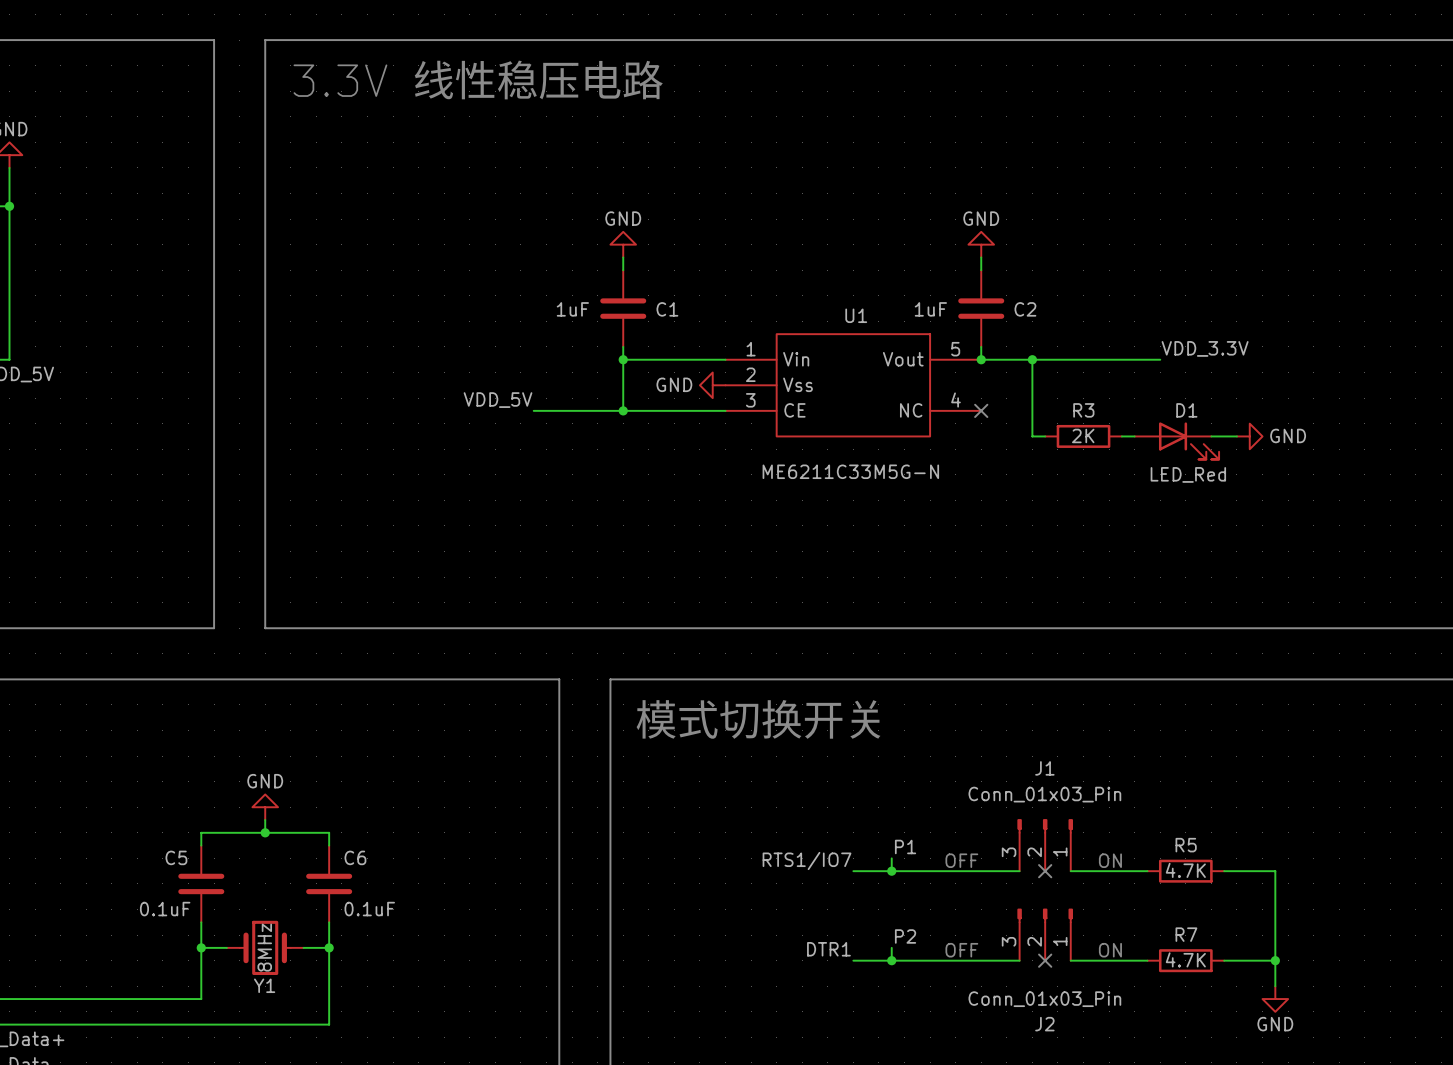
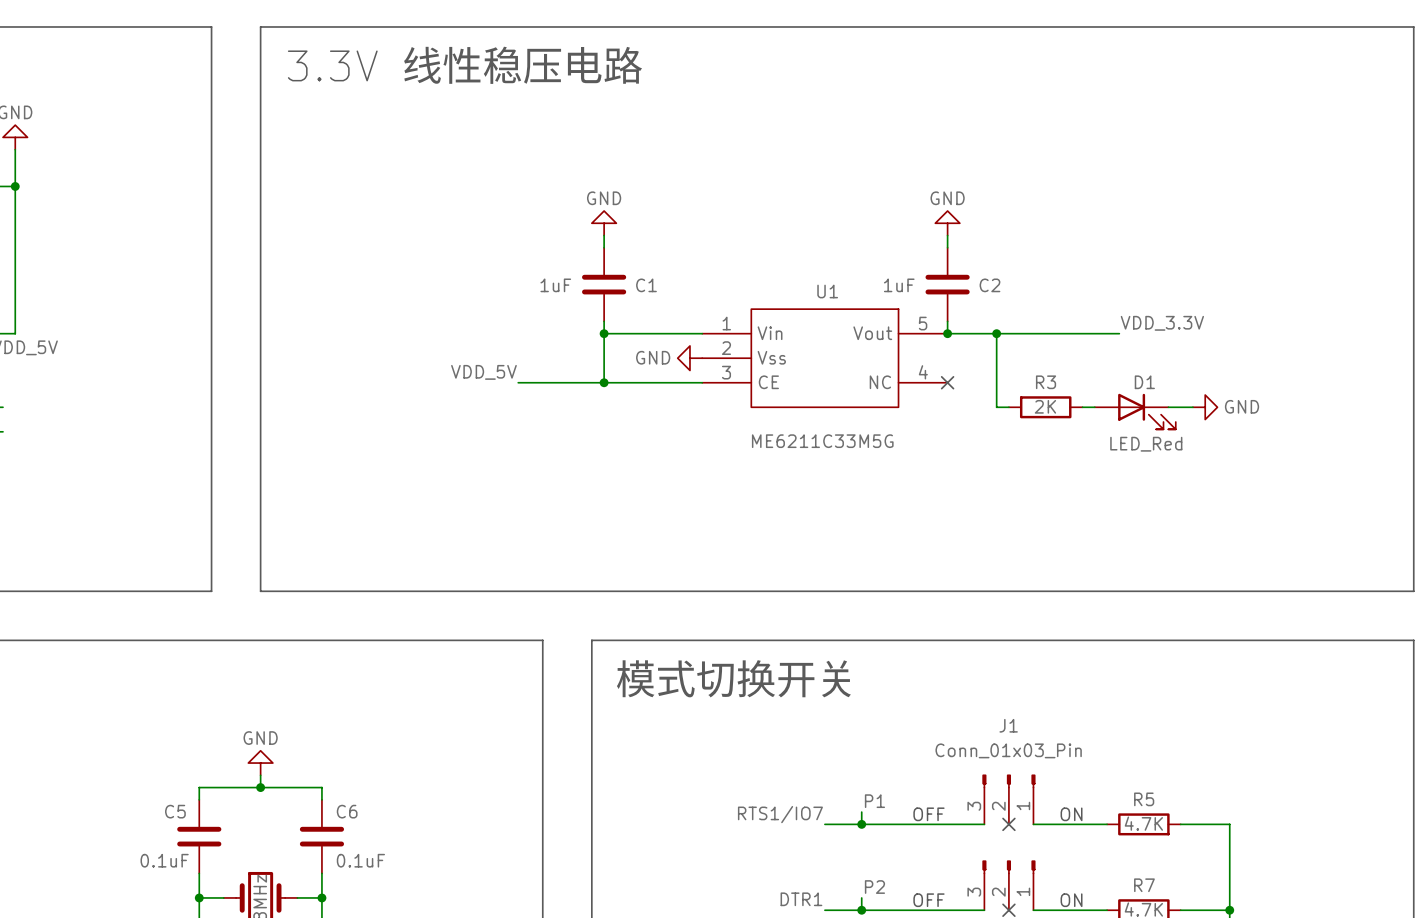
U1 value: ME6211C33M5G-N (850, 471) -> ME6211C33M5G (822, 441)

